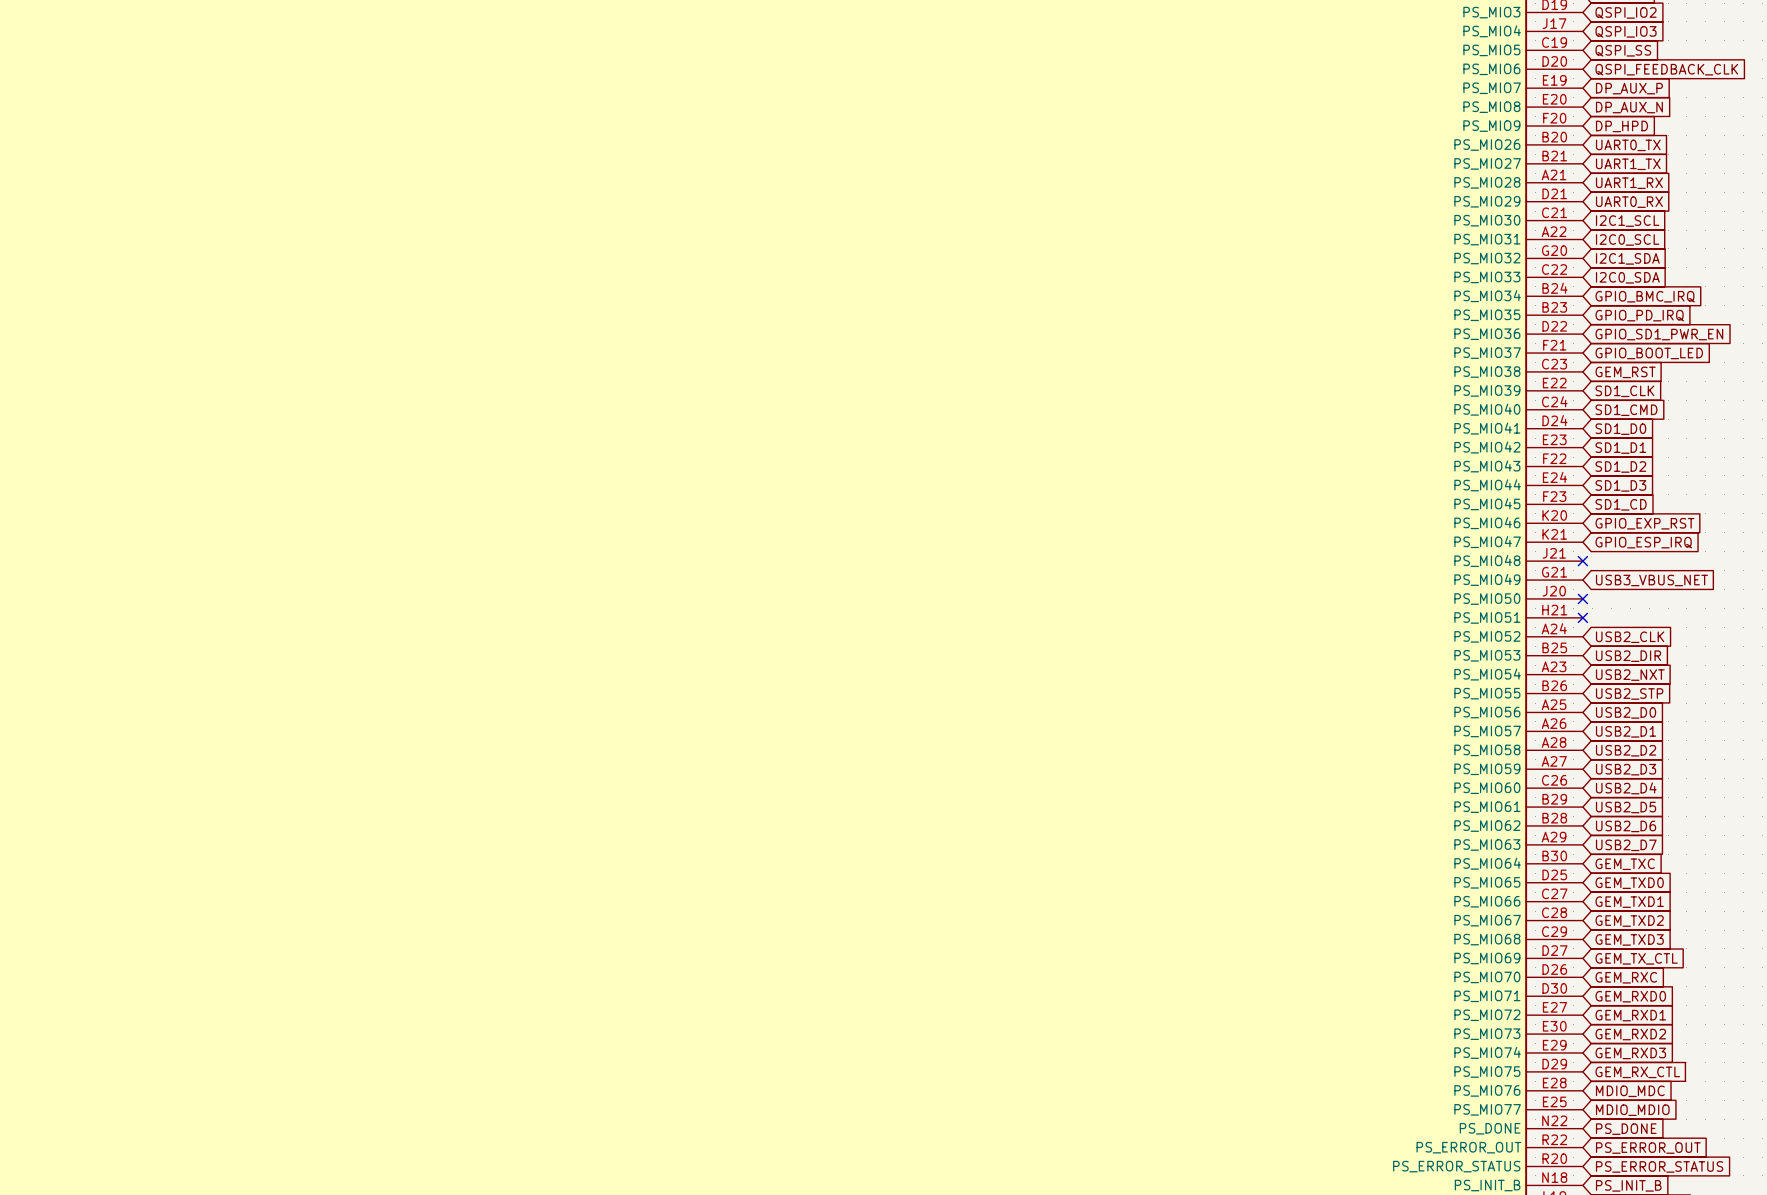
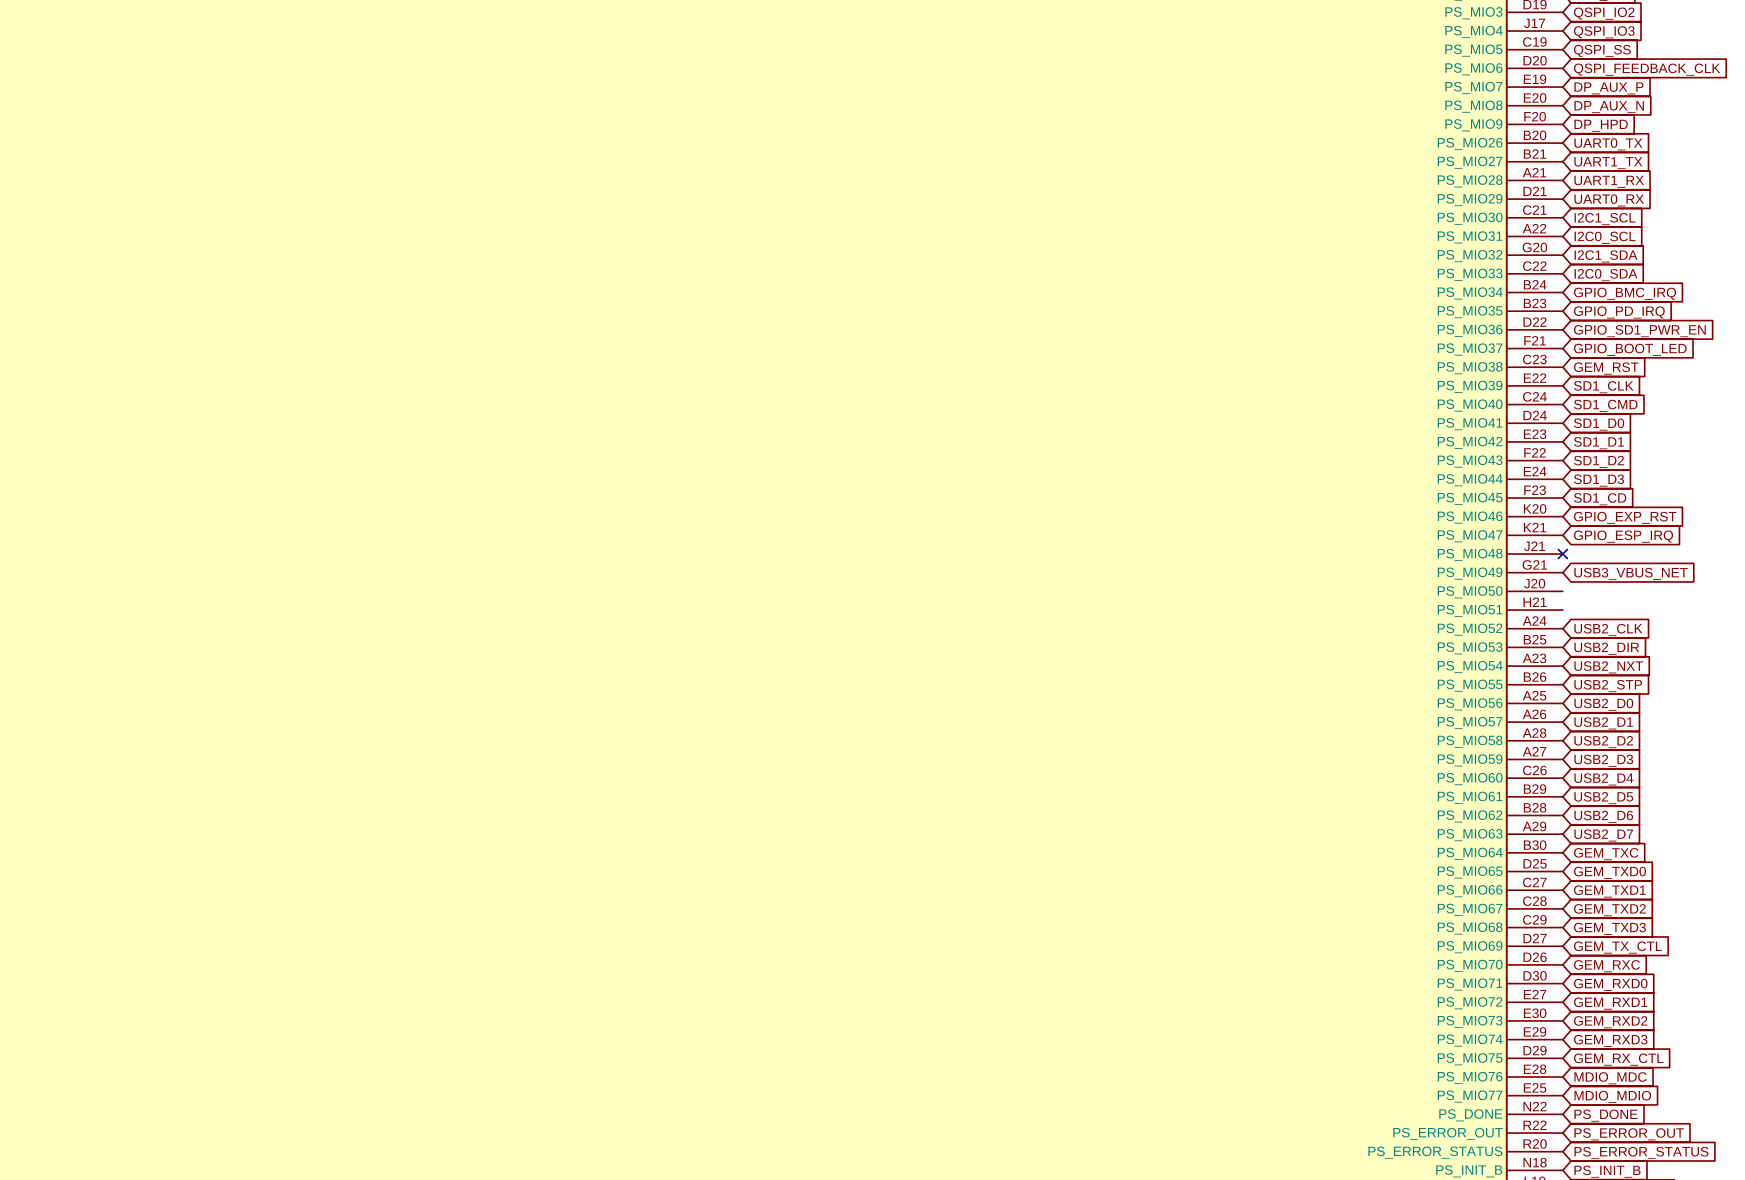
no-connect mark: (1582, 598) -> none
no-connect mark: (1582, 617) -> none

